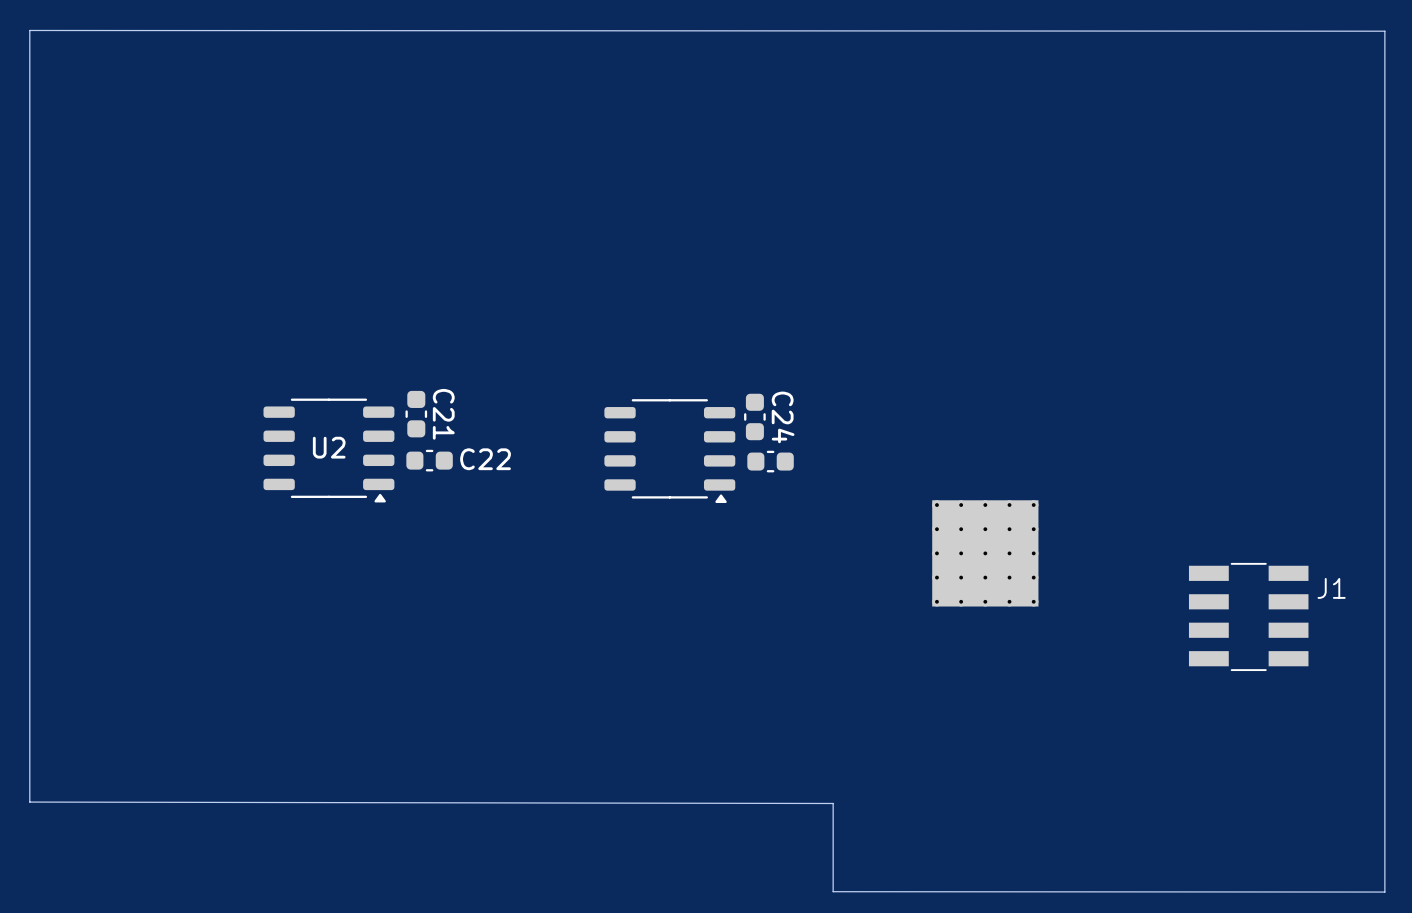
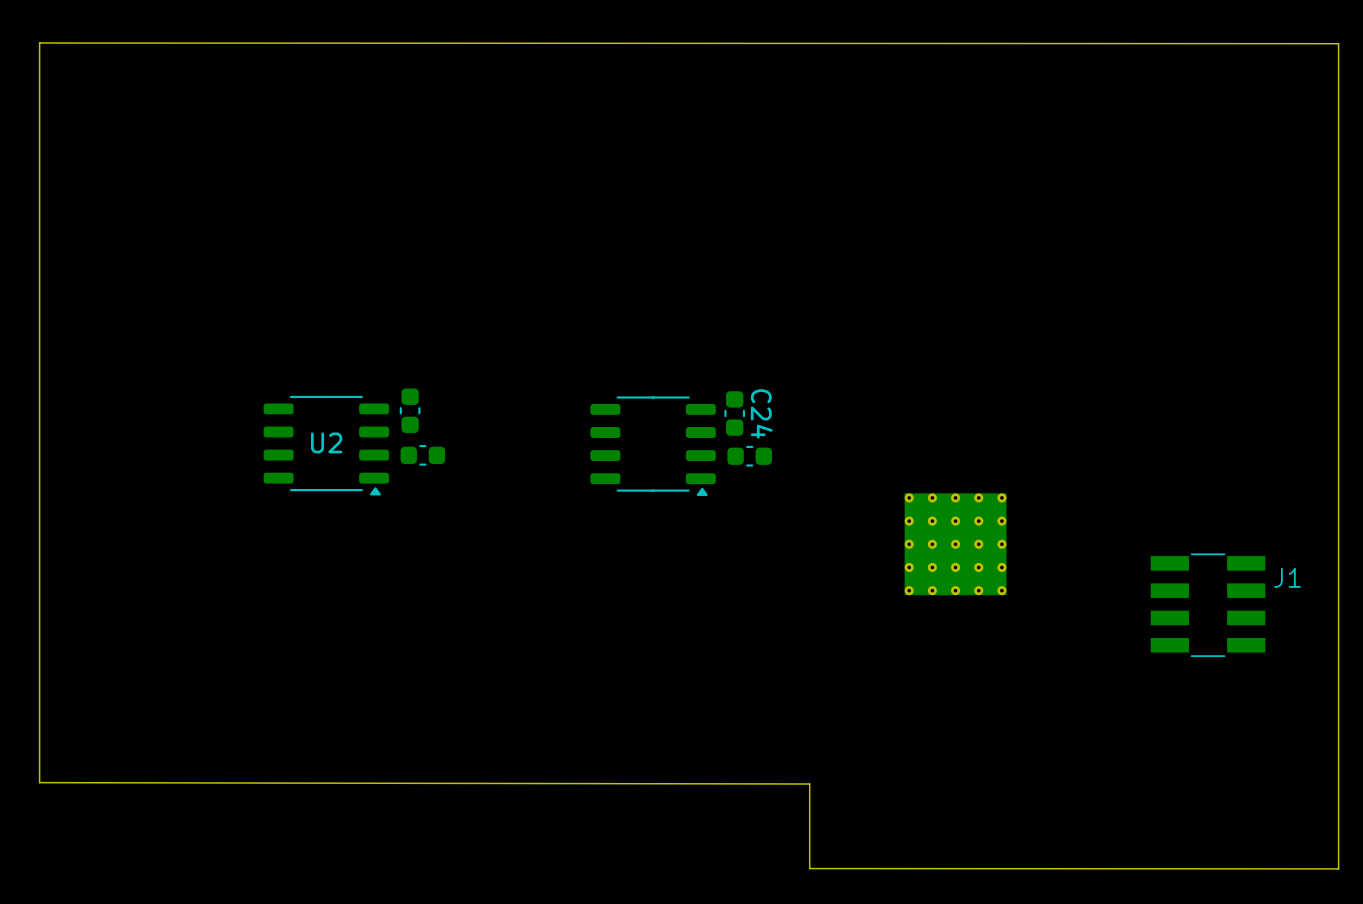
C21 name: C21 (443, 414) -> none
C22 name: C22 (485, 459) -> none

